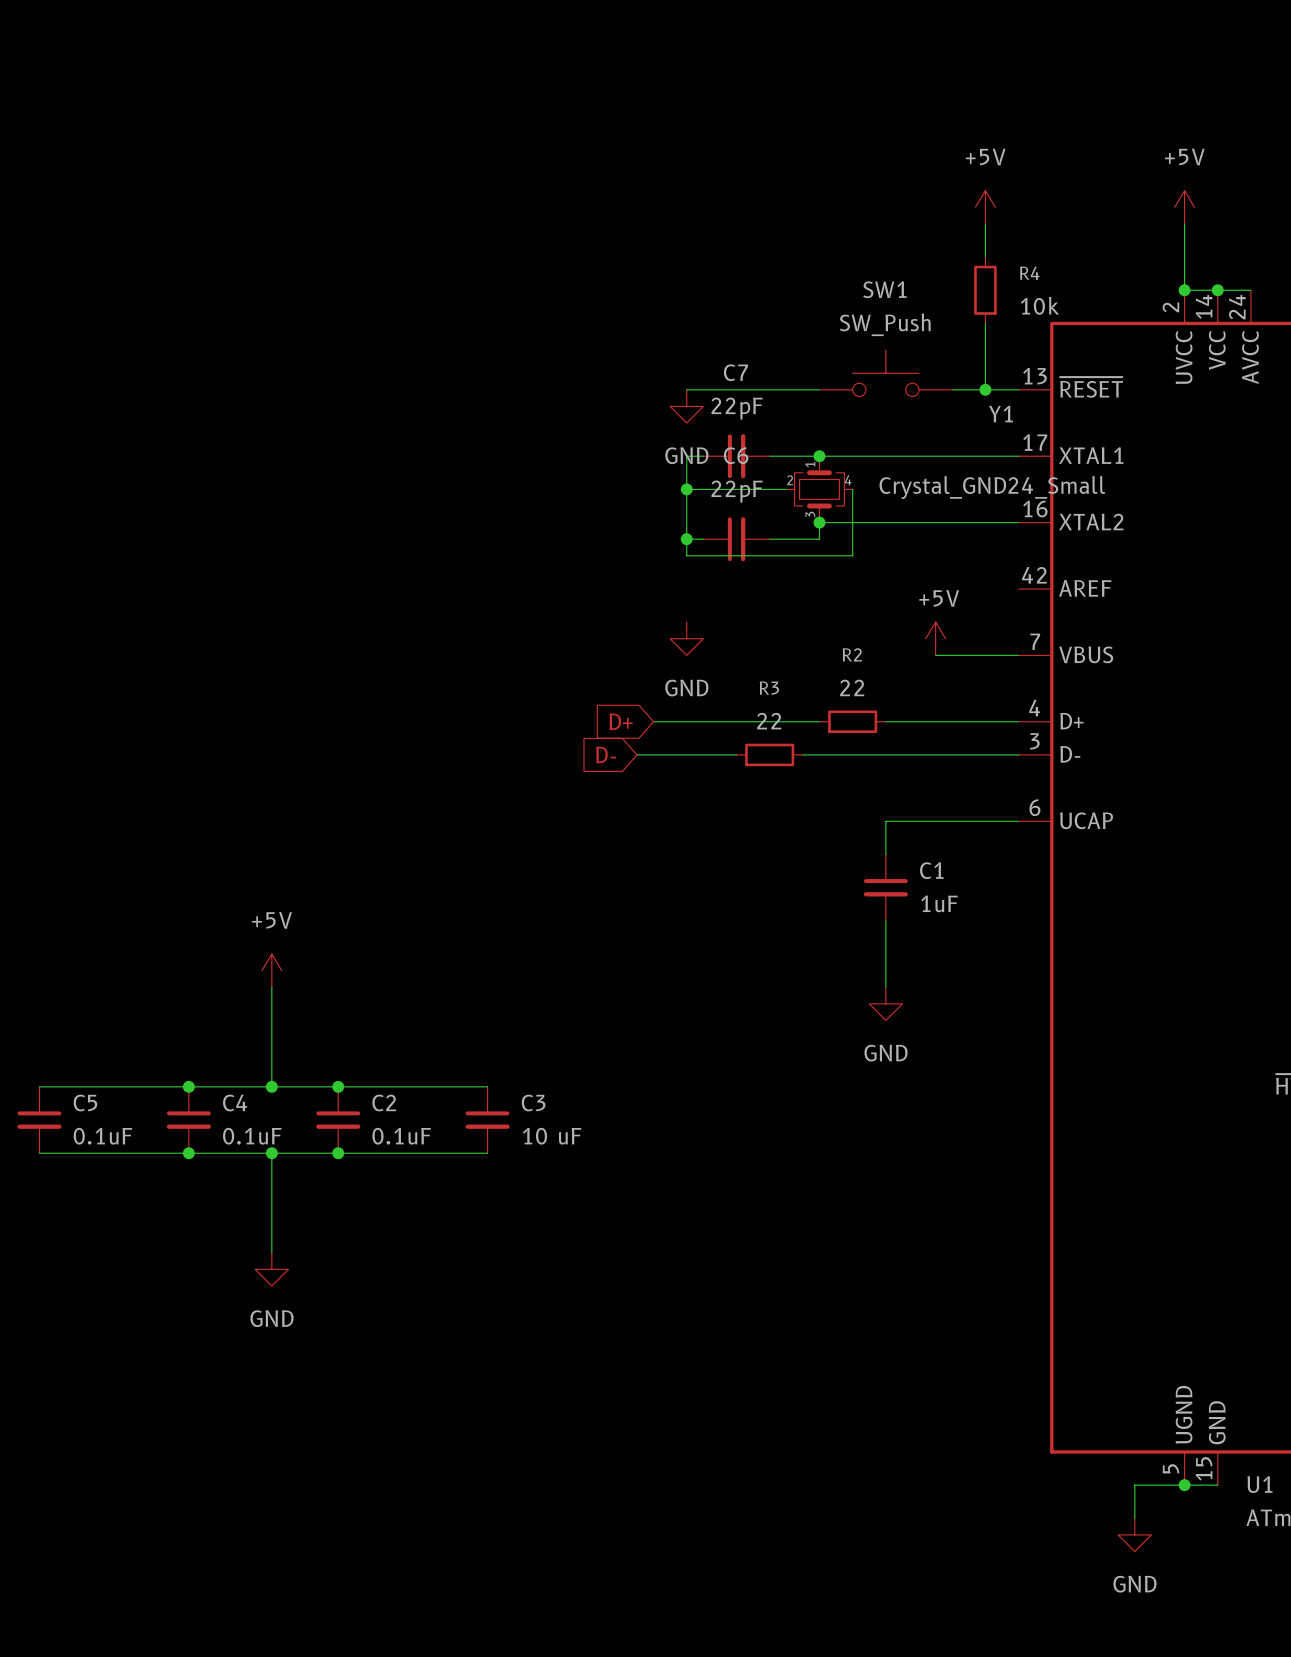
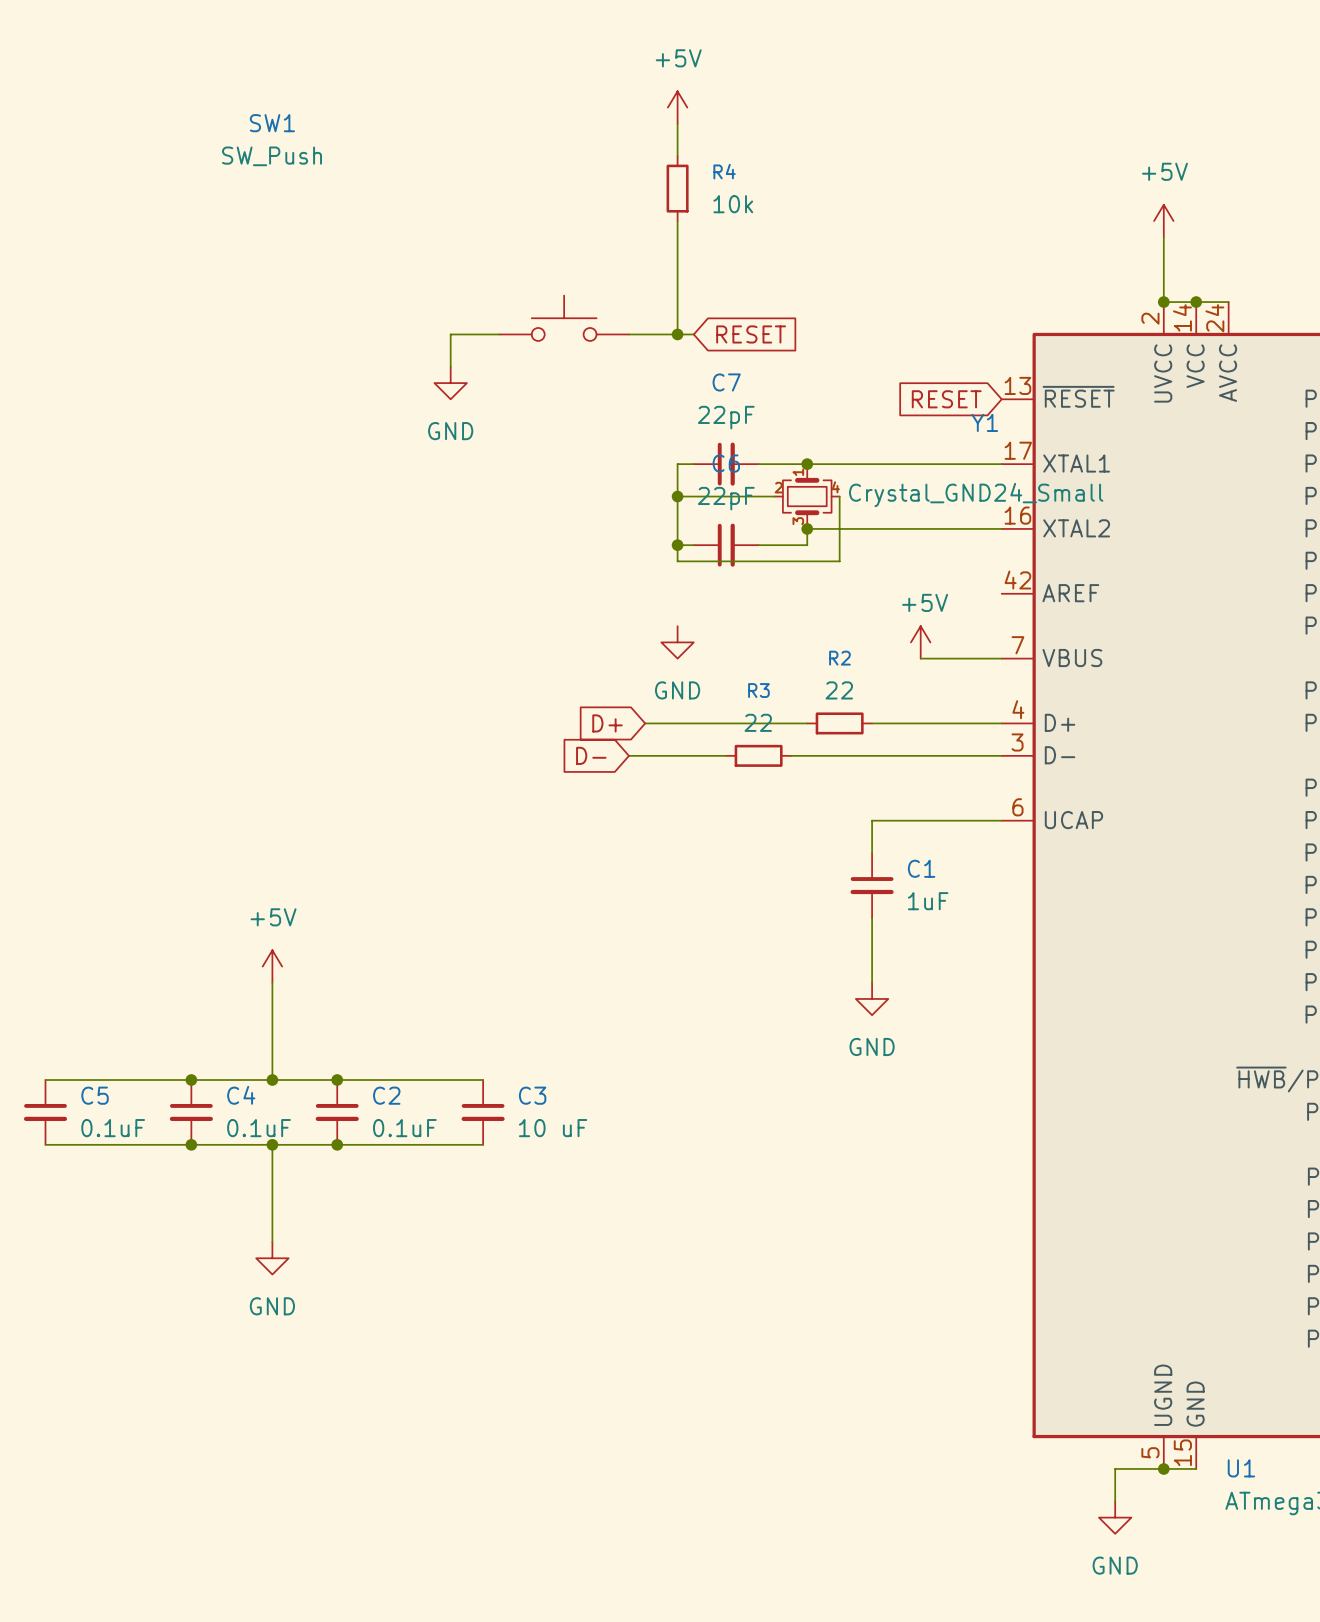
wire: none -> (677, 221) (677, 334)
power symbol position: +5V (985, 207) -> +5V (677, 107)
wire: (985, 223) (985, 257) -> (677, 123) (677, 156)
SW1 name position: SW1 (884, 289) -> SW1 (272, 123)
R4 position: (985, 290) -> (677, 188)
wire: none -> (499, 334) (450, 334) (450, 366)
junction: none -> (677, 334)
global label: none -> RESET (751, 334)
wire: (985, 323) (985, 389) -> none
SW1 value position: SW_Push (885, 324) -> SW_Push (272, 156)
SW1 position: (885, 373) -> (564, 318)
wire: (686, 389) (819, 389) -> none
wire: (952, 389) (1018, 389) -> (628, 334) (693, 334)
global label: none -> RESET (946, 399)
junction: (985, 389) -> none
power symbol position: GND (686, 406) -> GND (450, 383)

